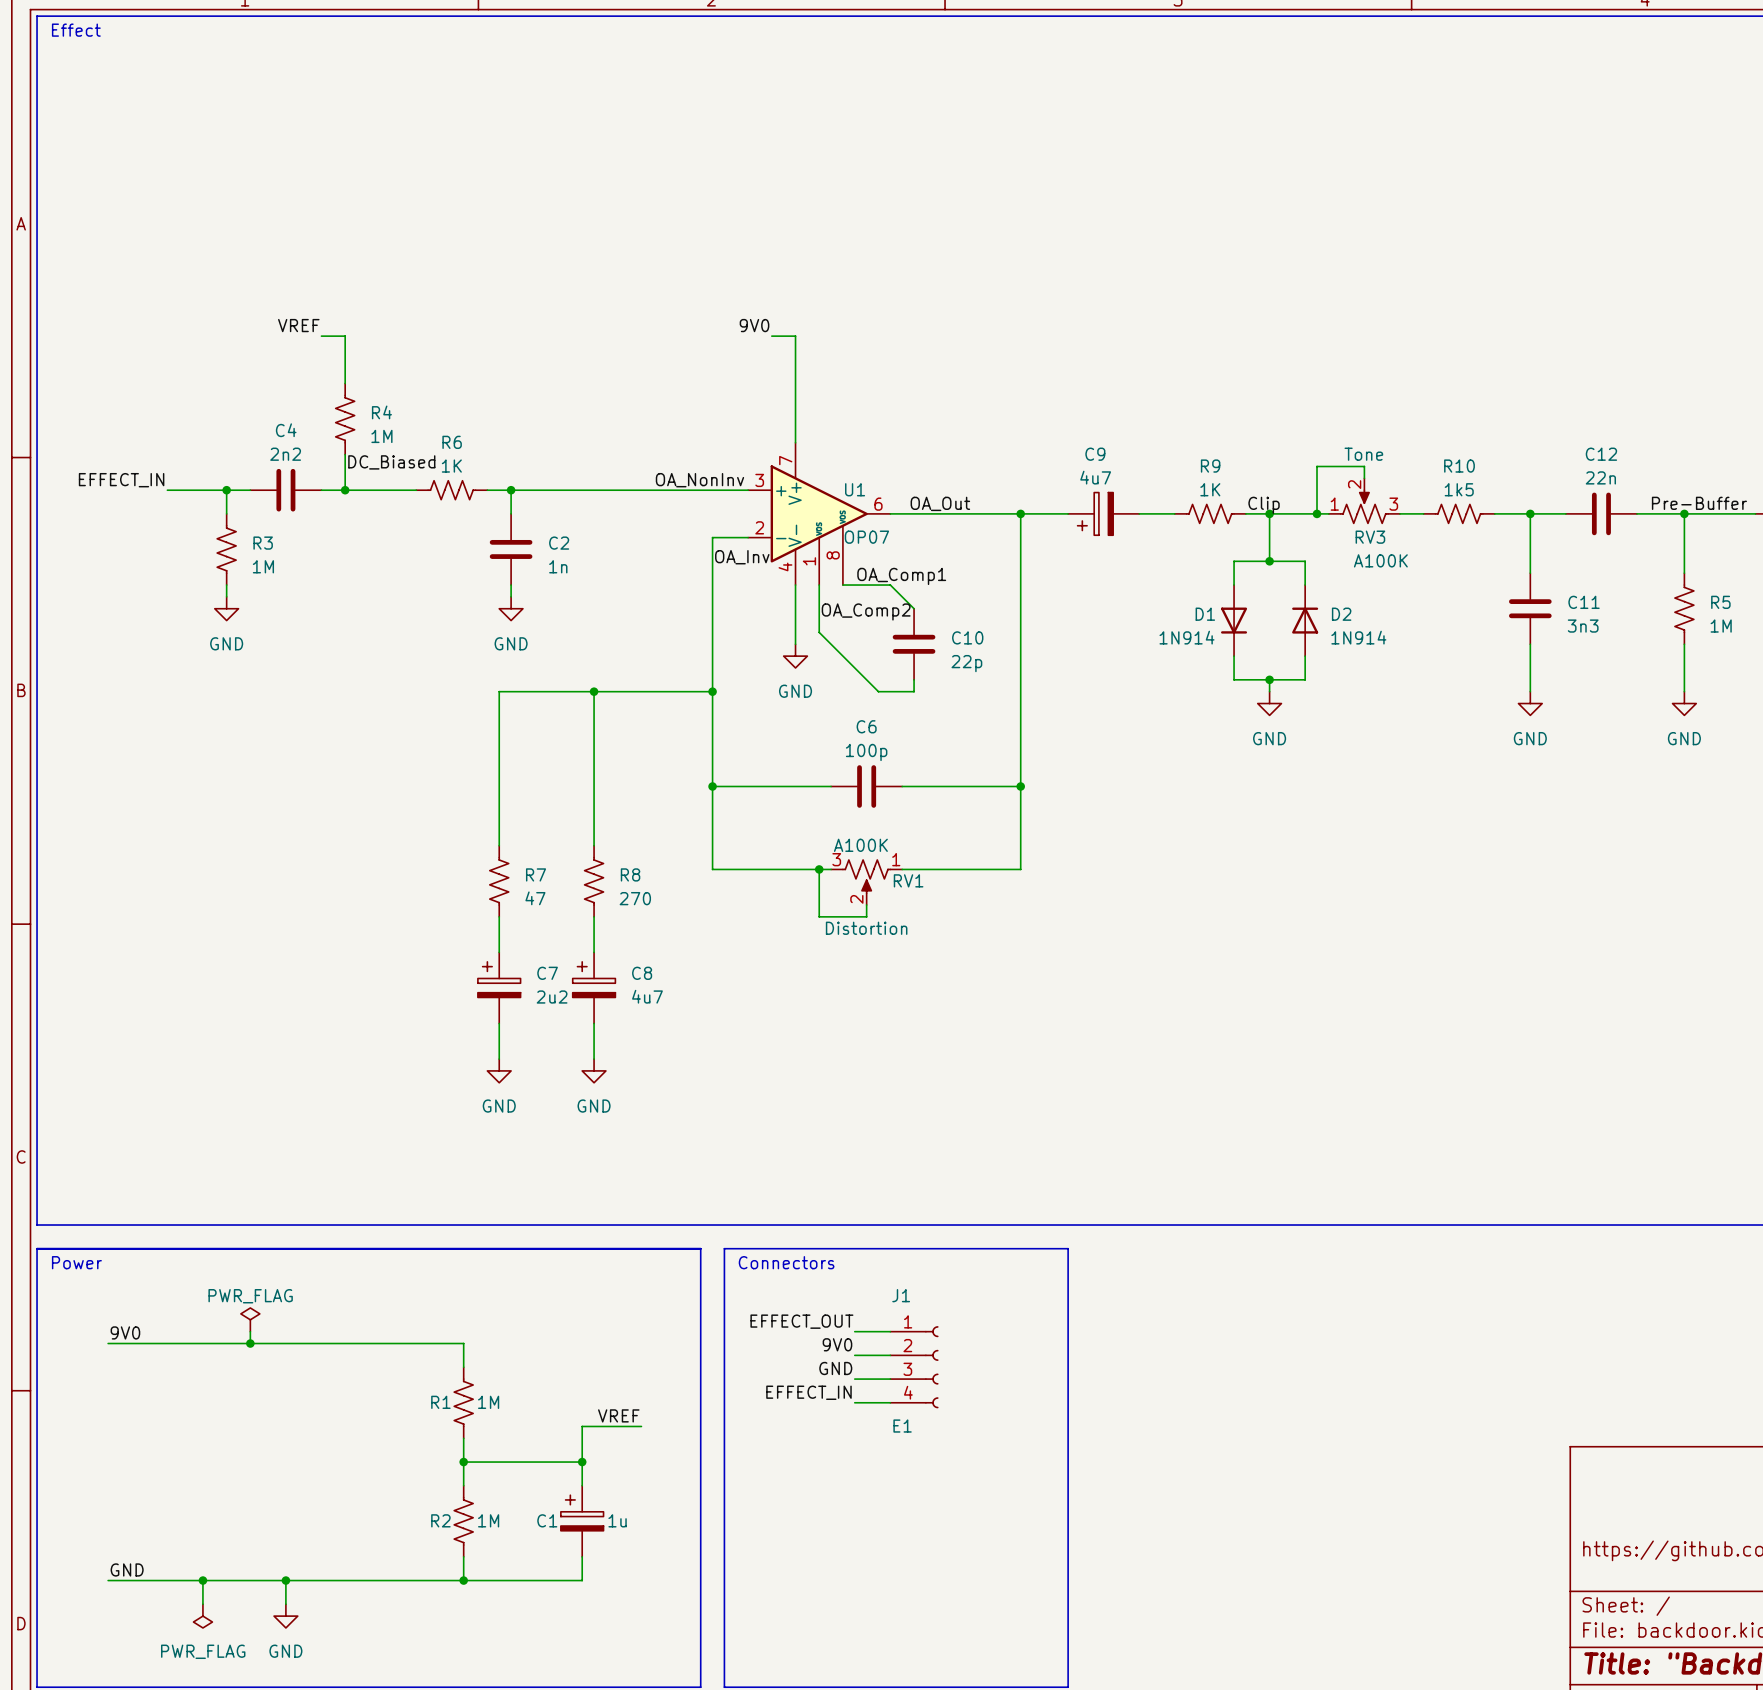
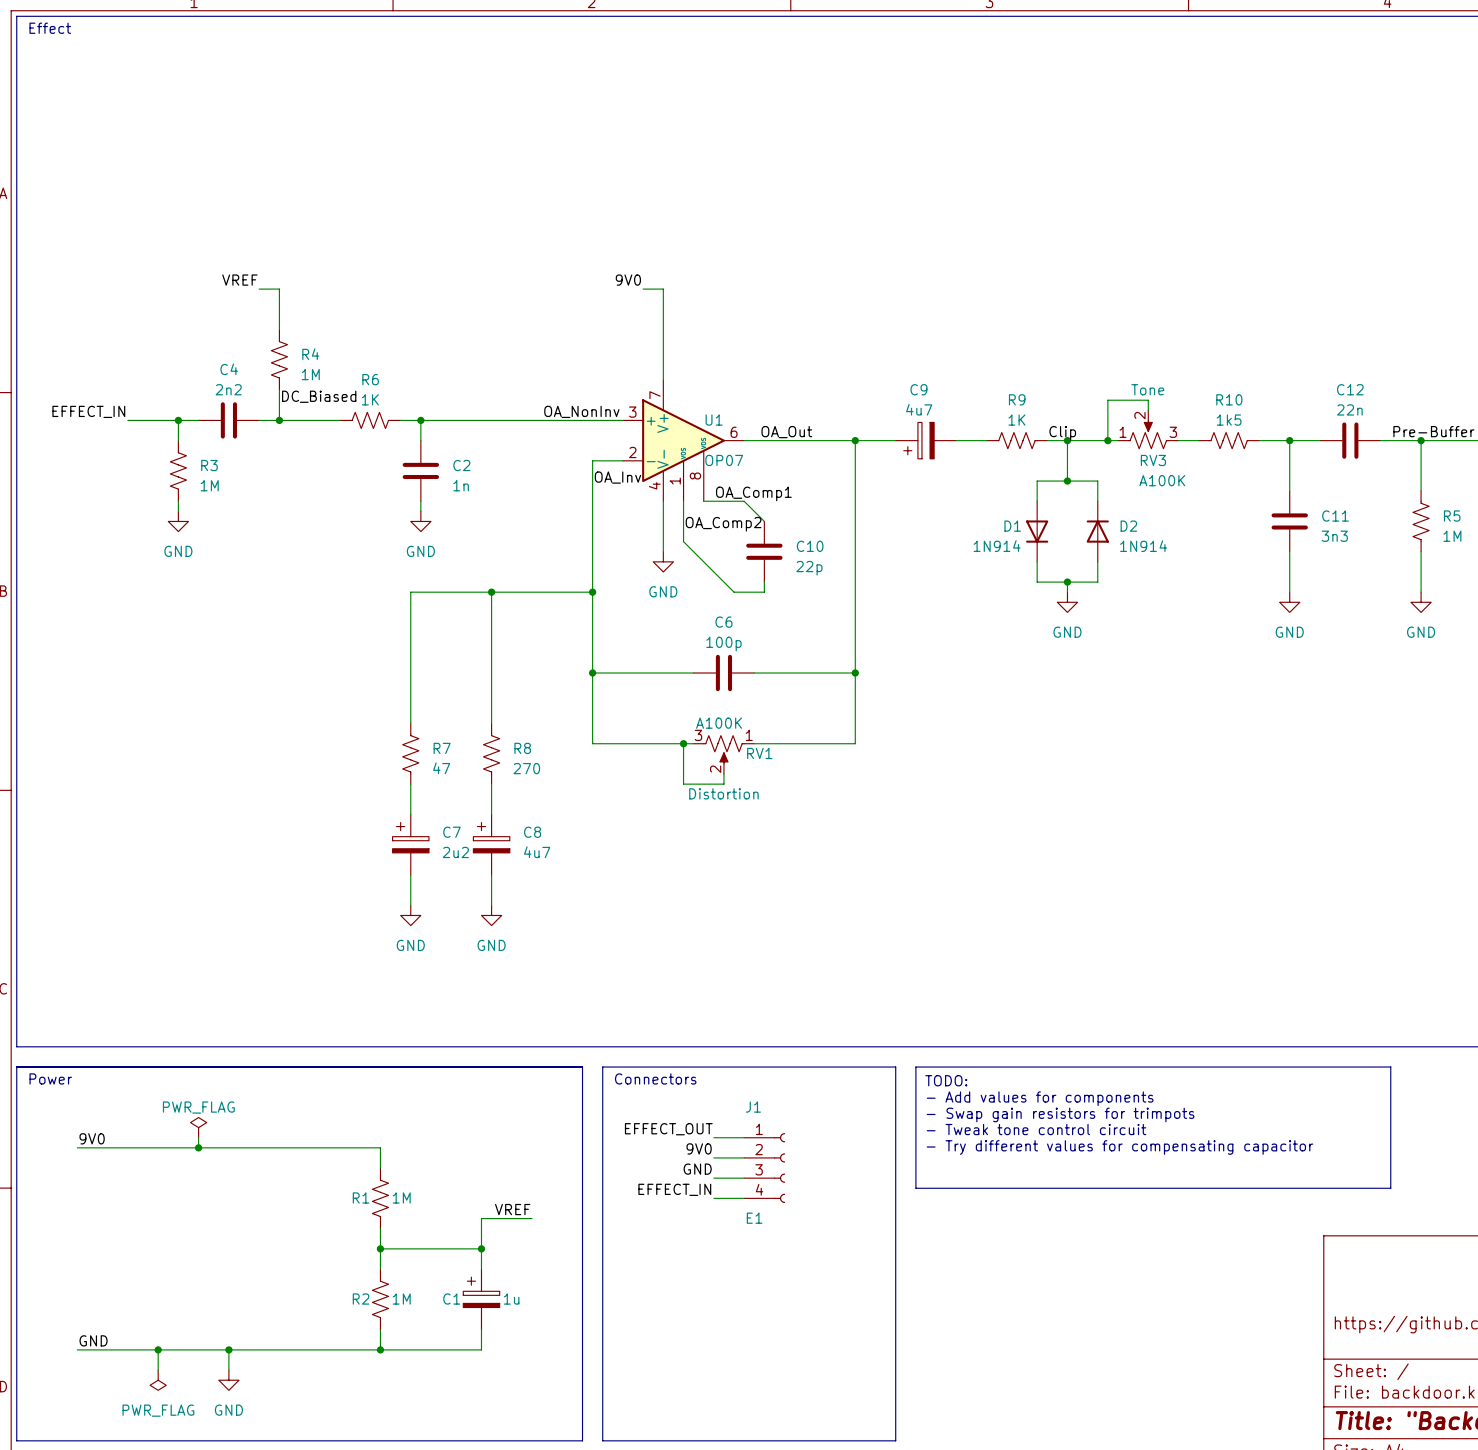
line: none -> (915, 1067) (1390, 1067) (1390, 1188) (915, 1188) (915, 1067)
text: none -> TODO: (946, 1080)
text: none -> - Add values for components (1040, 1098)
text: none -> - Swap gain resistors for trimpots (1060, 1114)
text: none -> - Tweak tone control circuit (1036, 1129)
text: none -> - Try different values for compensating capacitor (1119, 1147)

